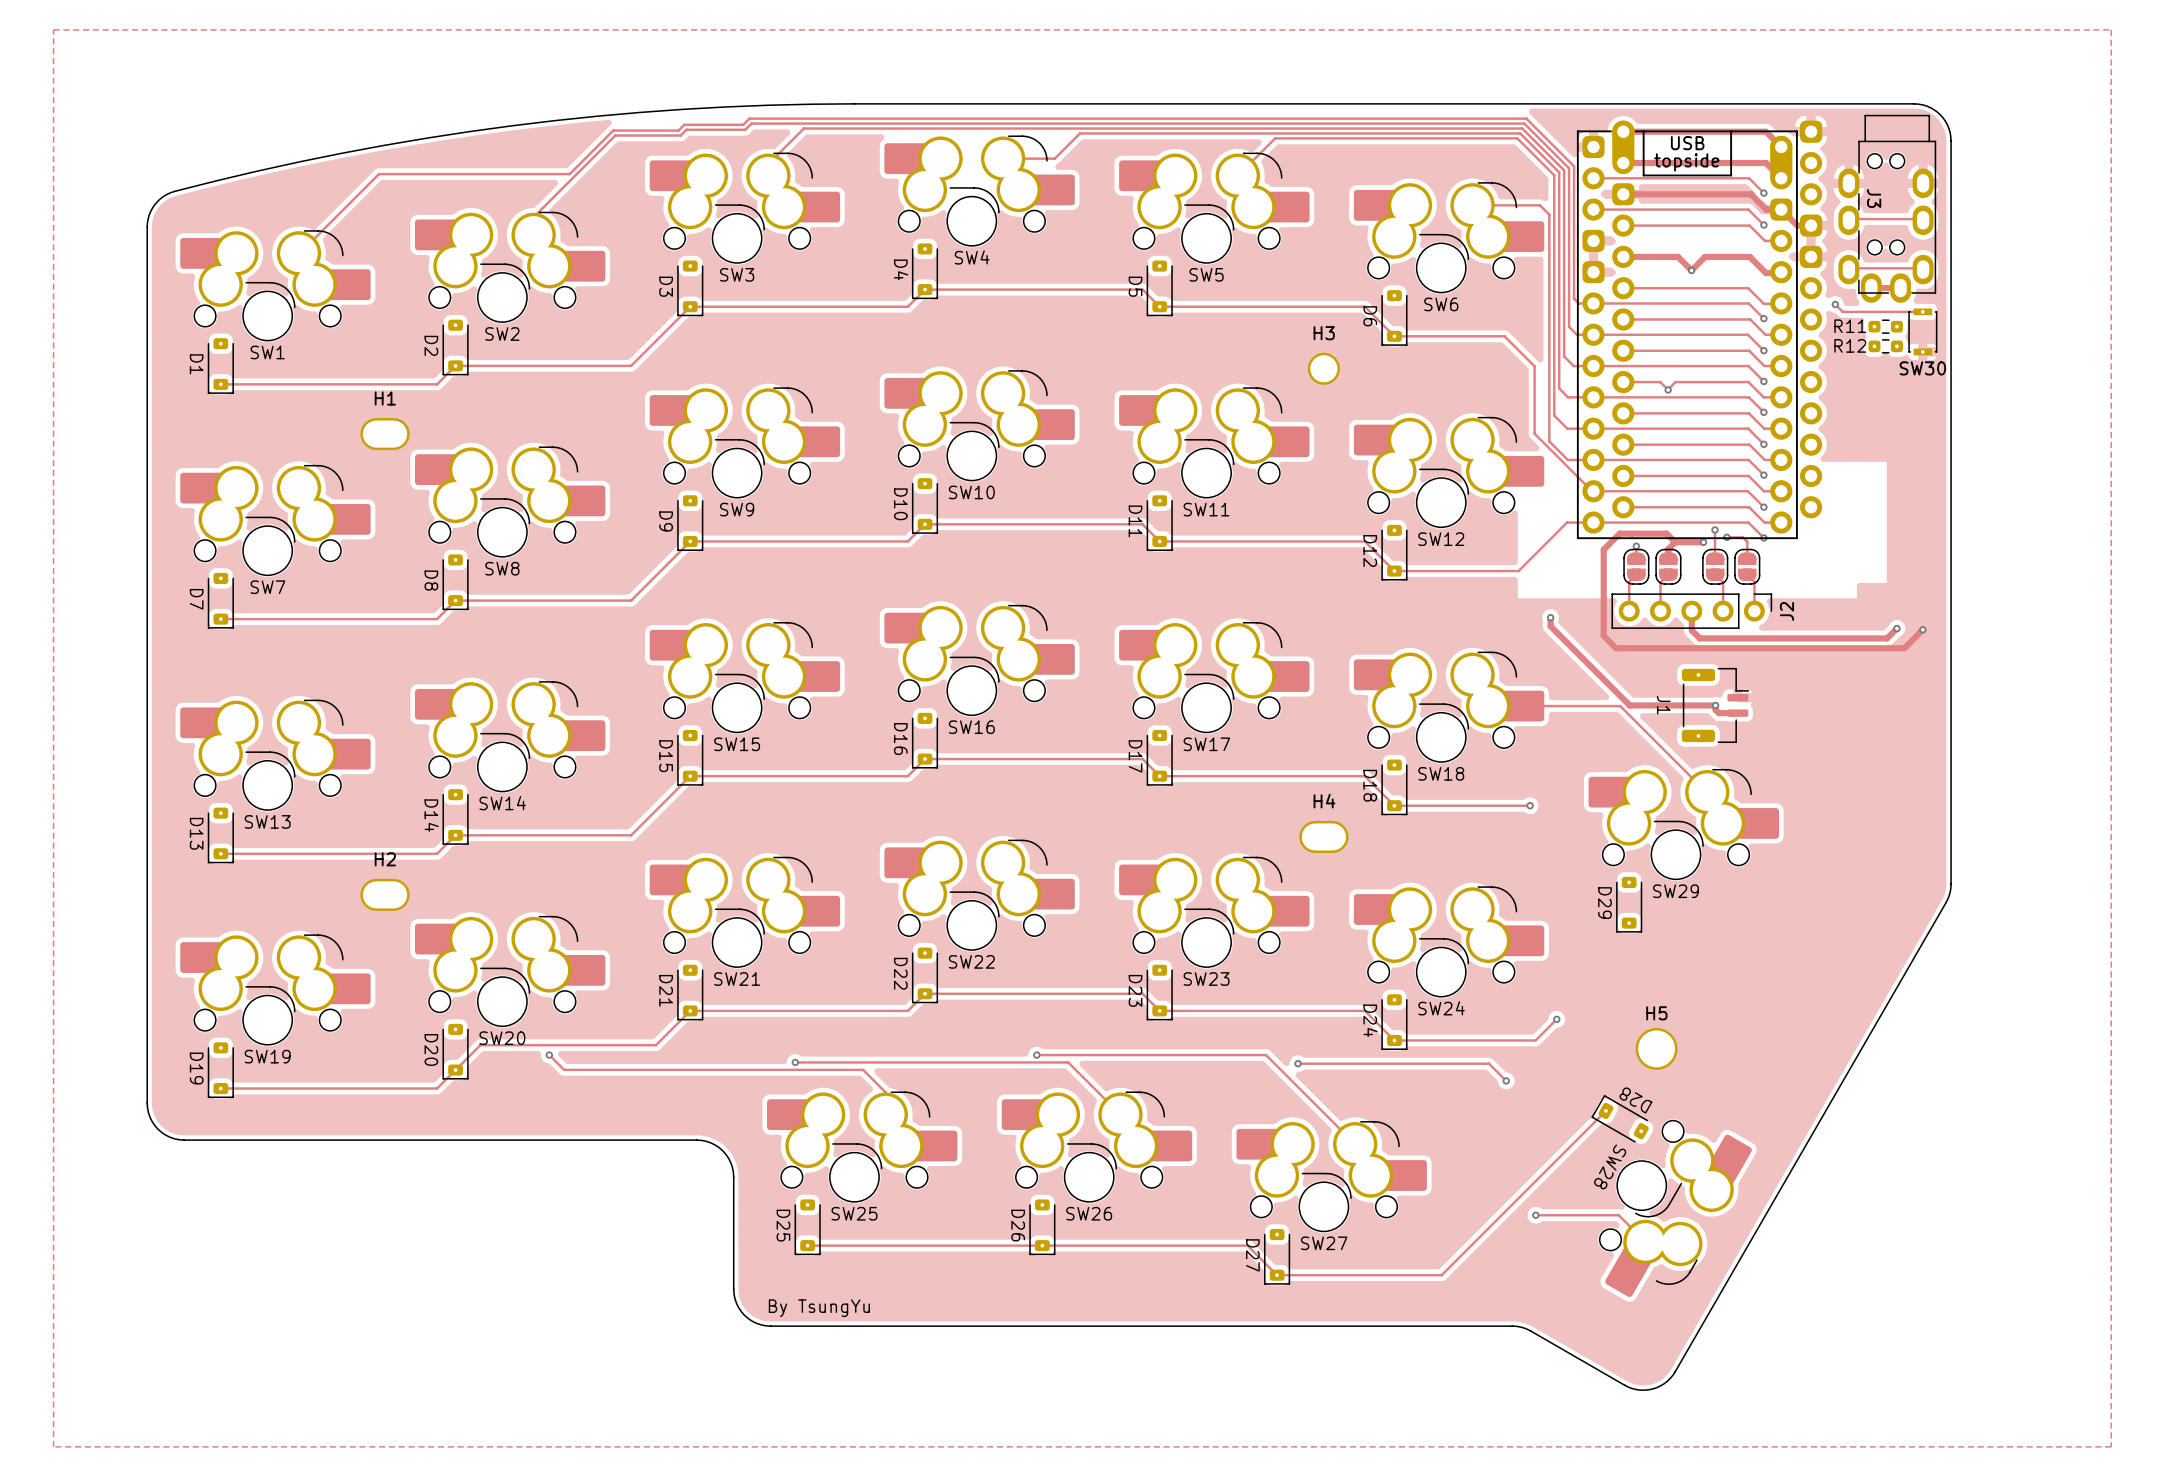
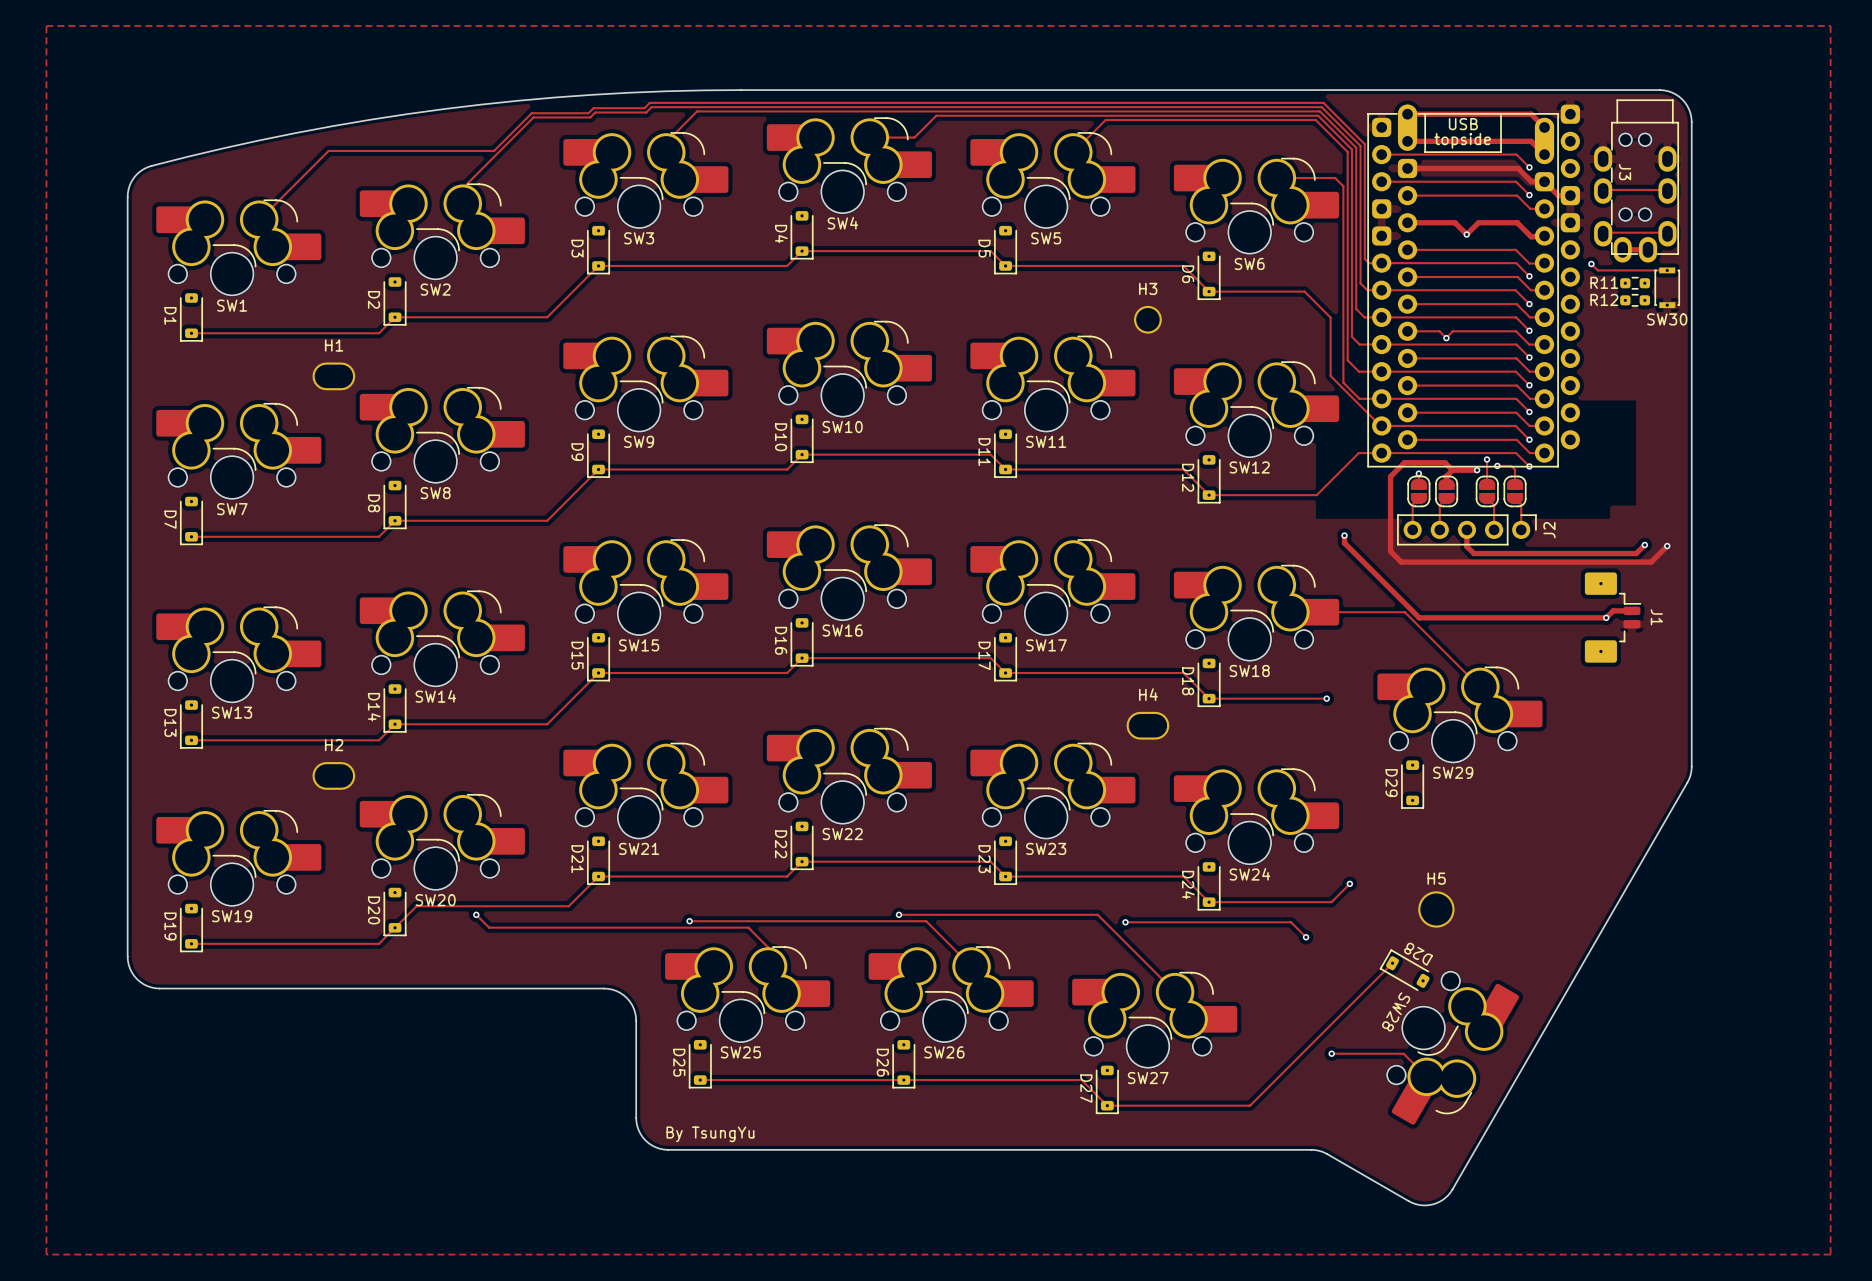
J1 footprint: [1681, 667, 1750, 743] -> [1584, 572, 1642, 663]
track: (1629, 705) (1715, 705) (1715, 709) (1718, 713) (1737, 713) -> (1413, 611) (1419, 617) (1606, 617) (1613, 610) (1631, 610)
J1 name position: J1 (1663, 705) -> J1 (1656, 617)
via: (1715, 705) -> none
via: none -> (1606, 617)

